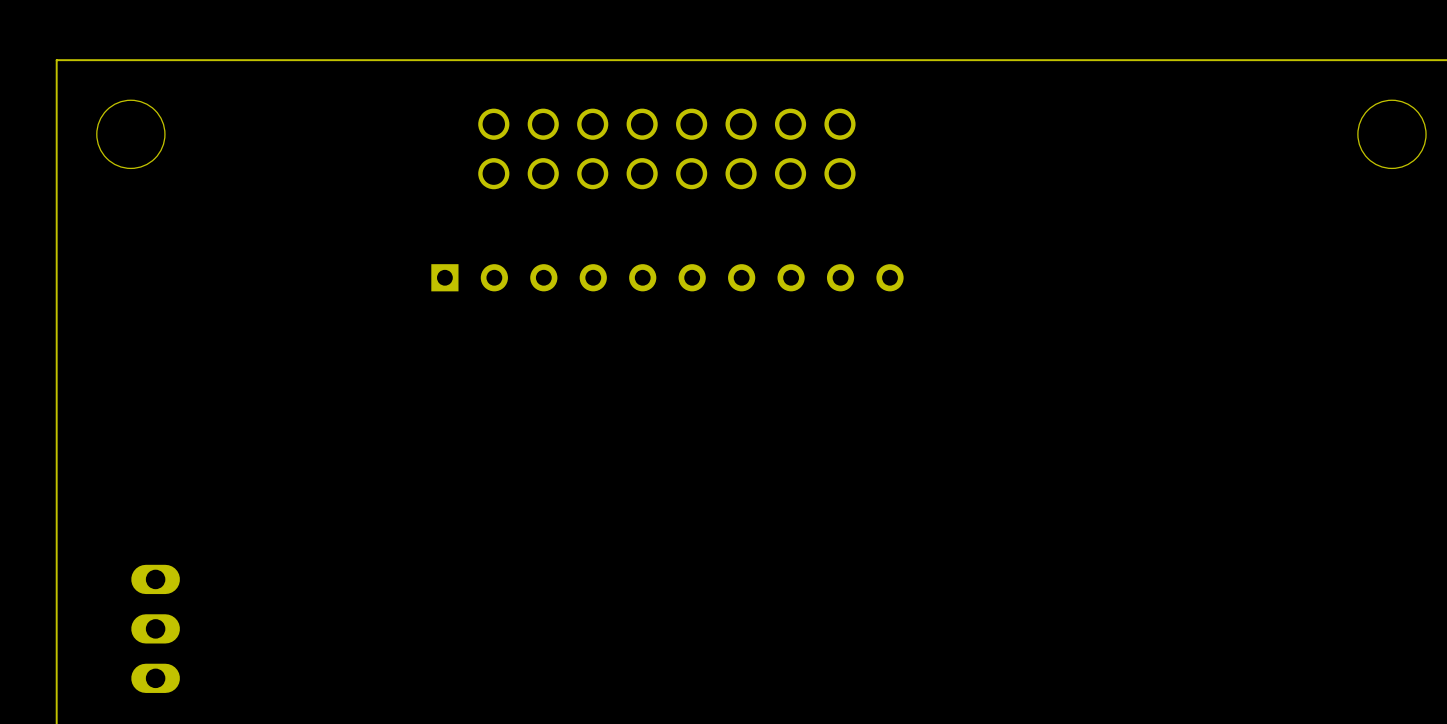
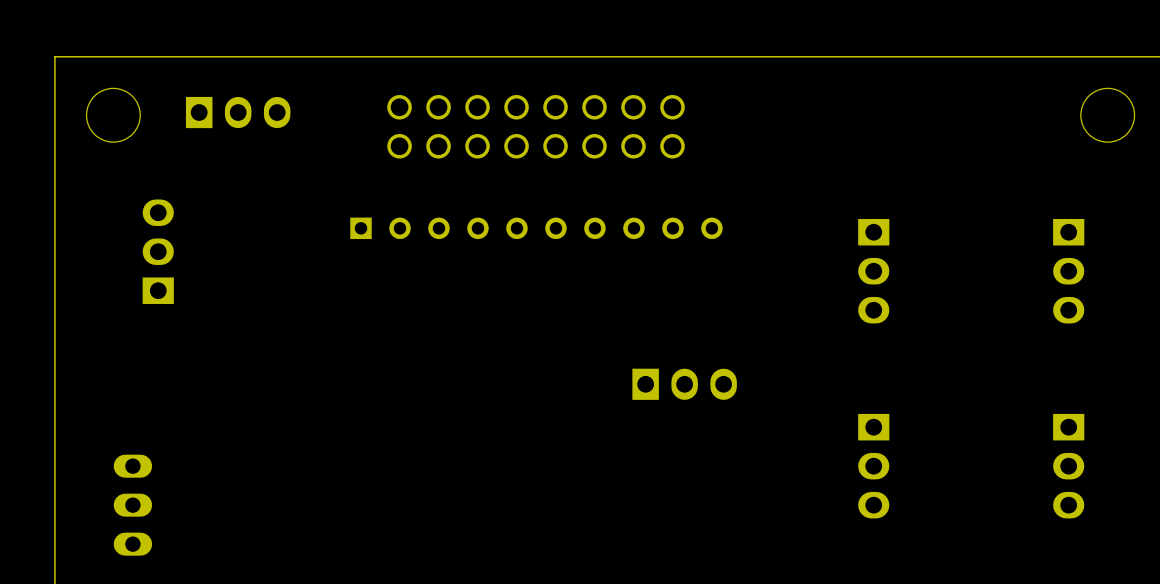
part: none -> (238, 112)
part: none -> (158, 251)
part: none -> (873, 271)
part: none -> (1068, 271)
part: none -> (684, 384)
part: none -> (873, 466)
part: none -> (1068, 466)

